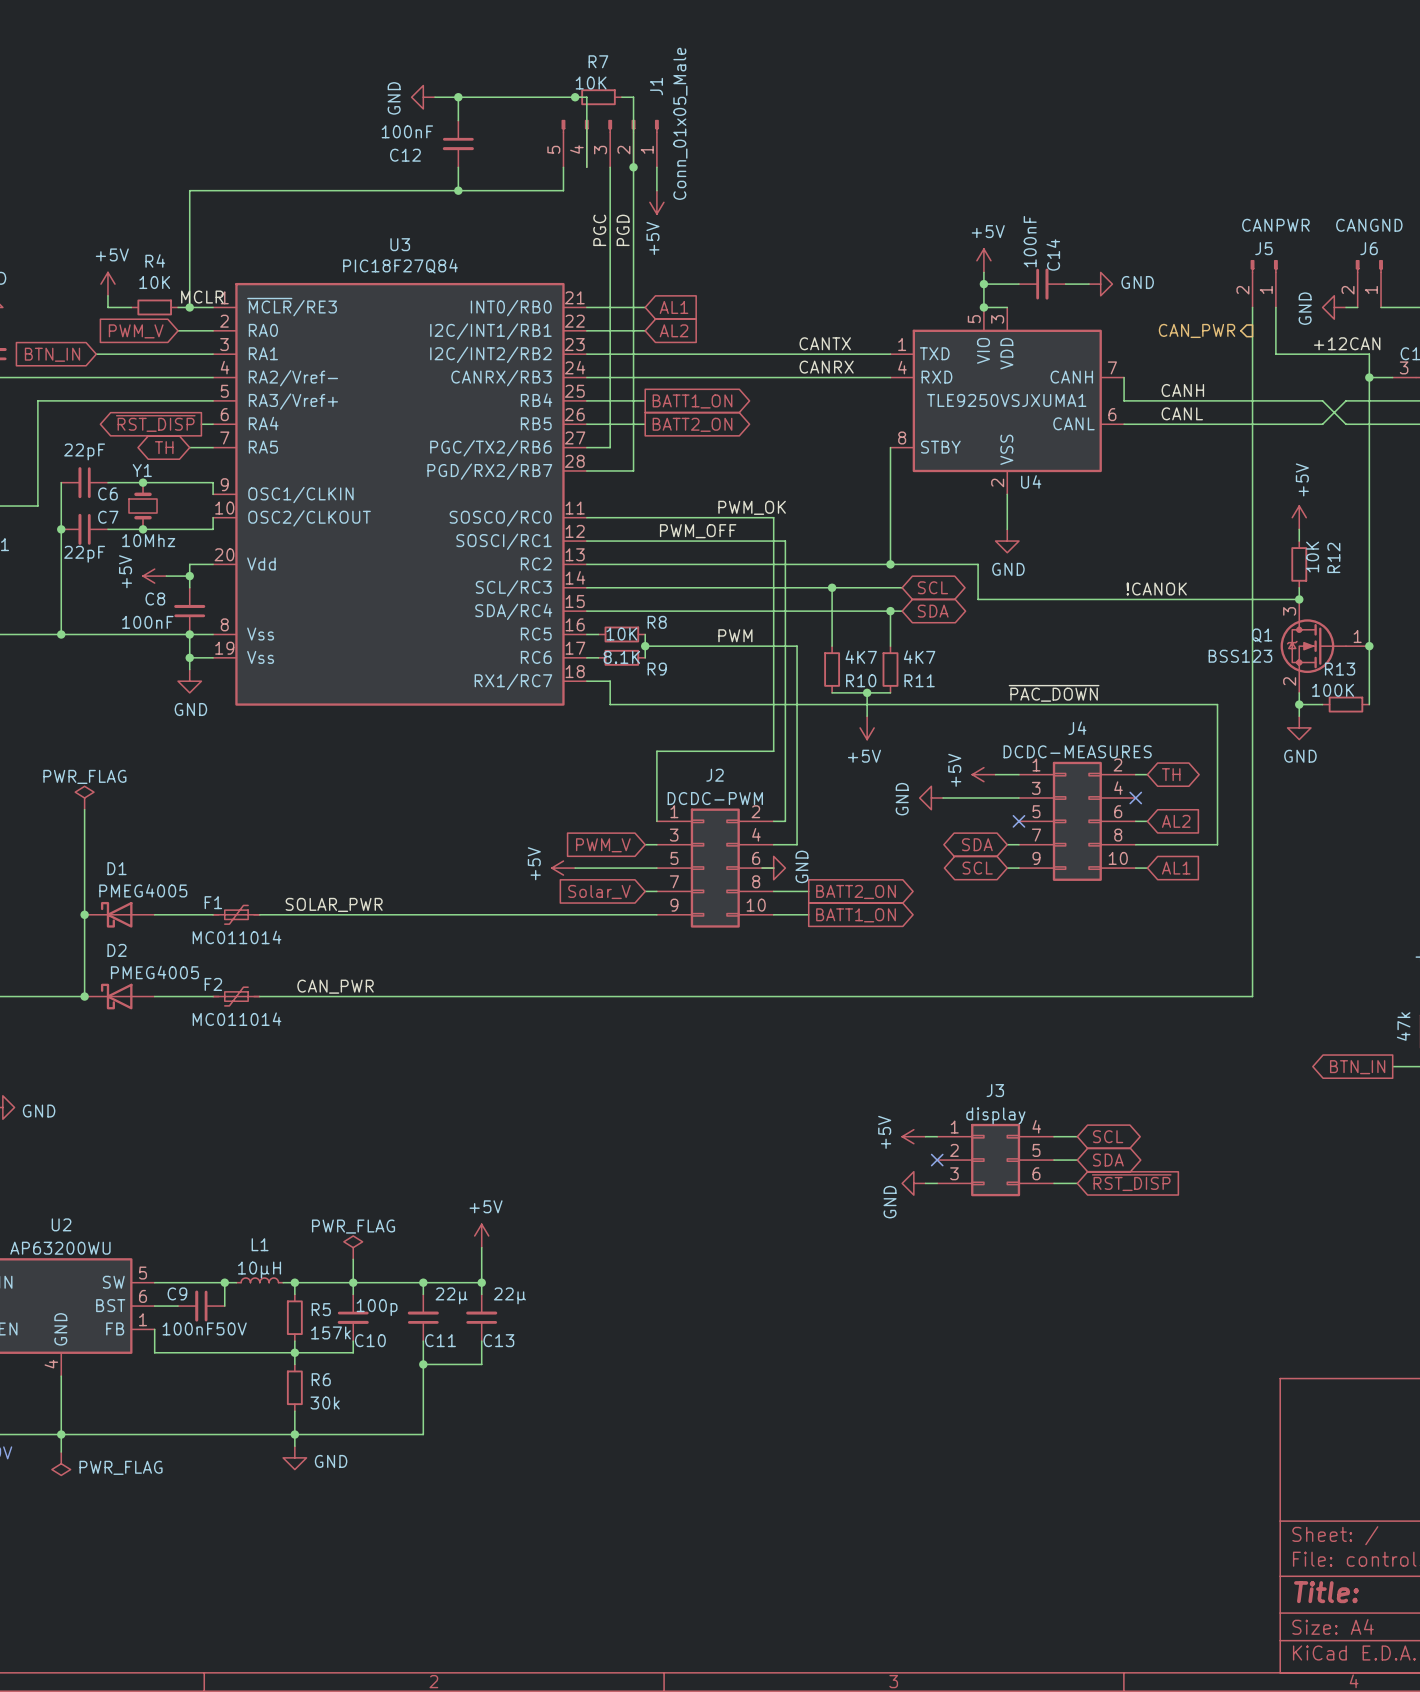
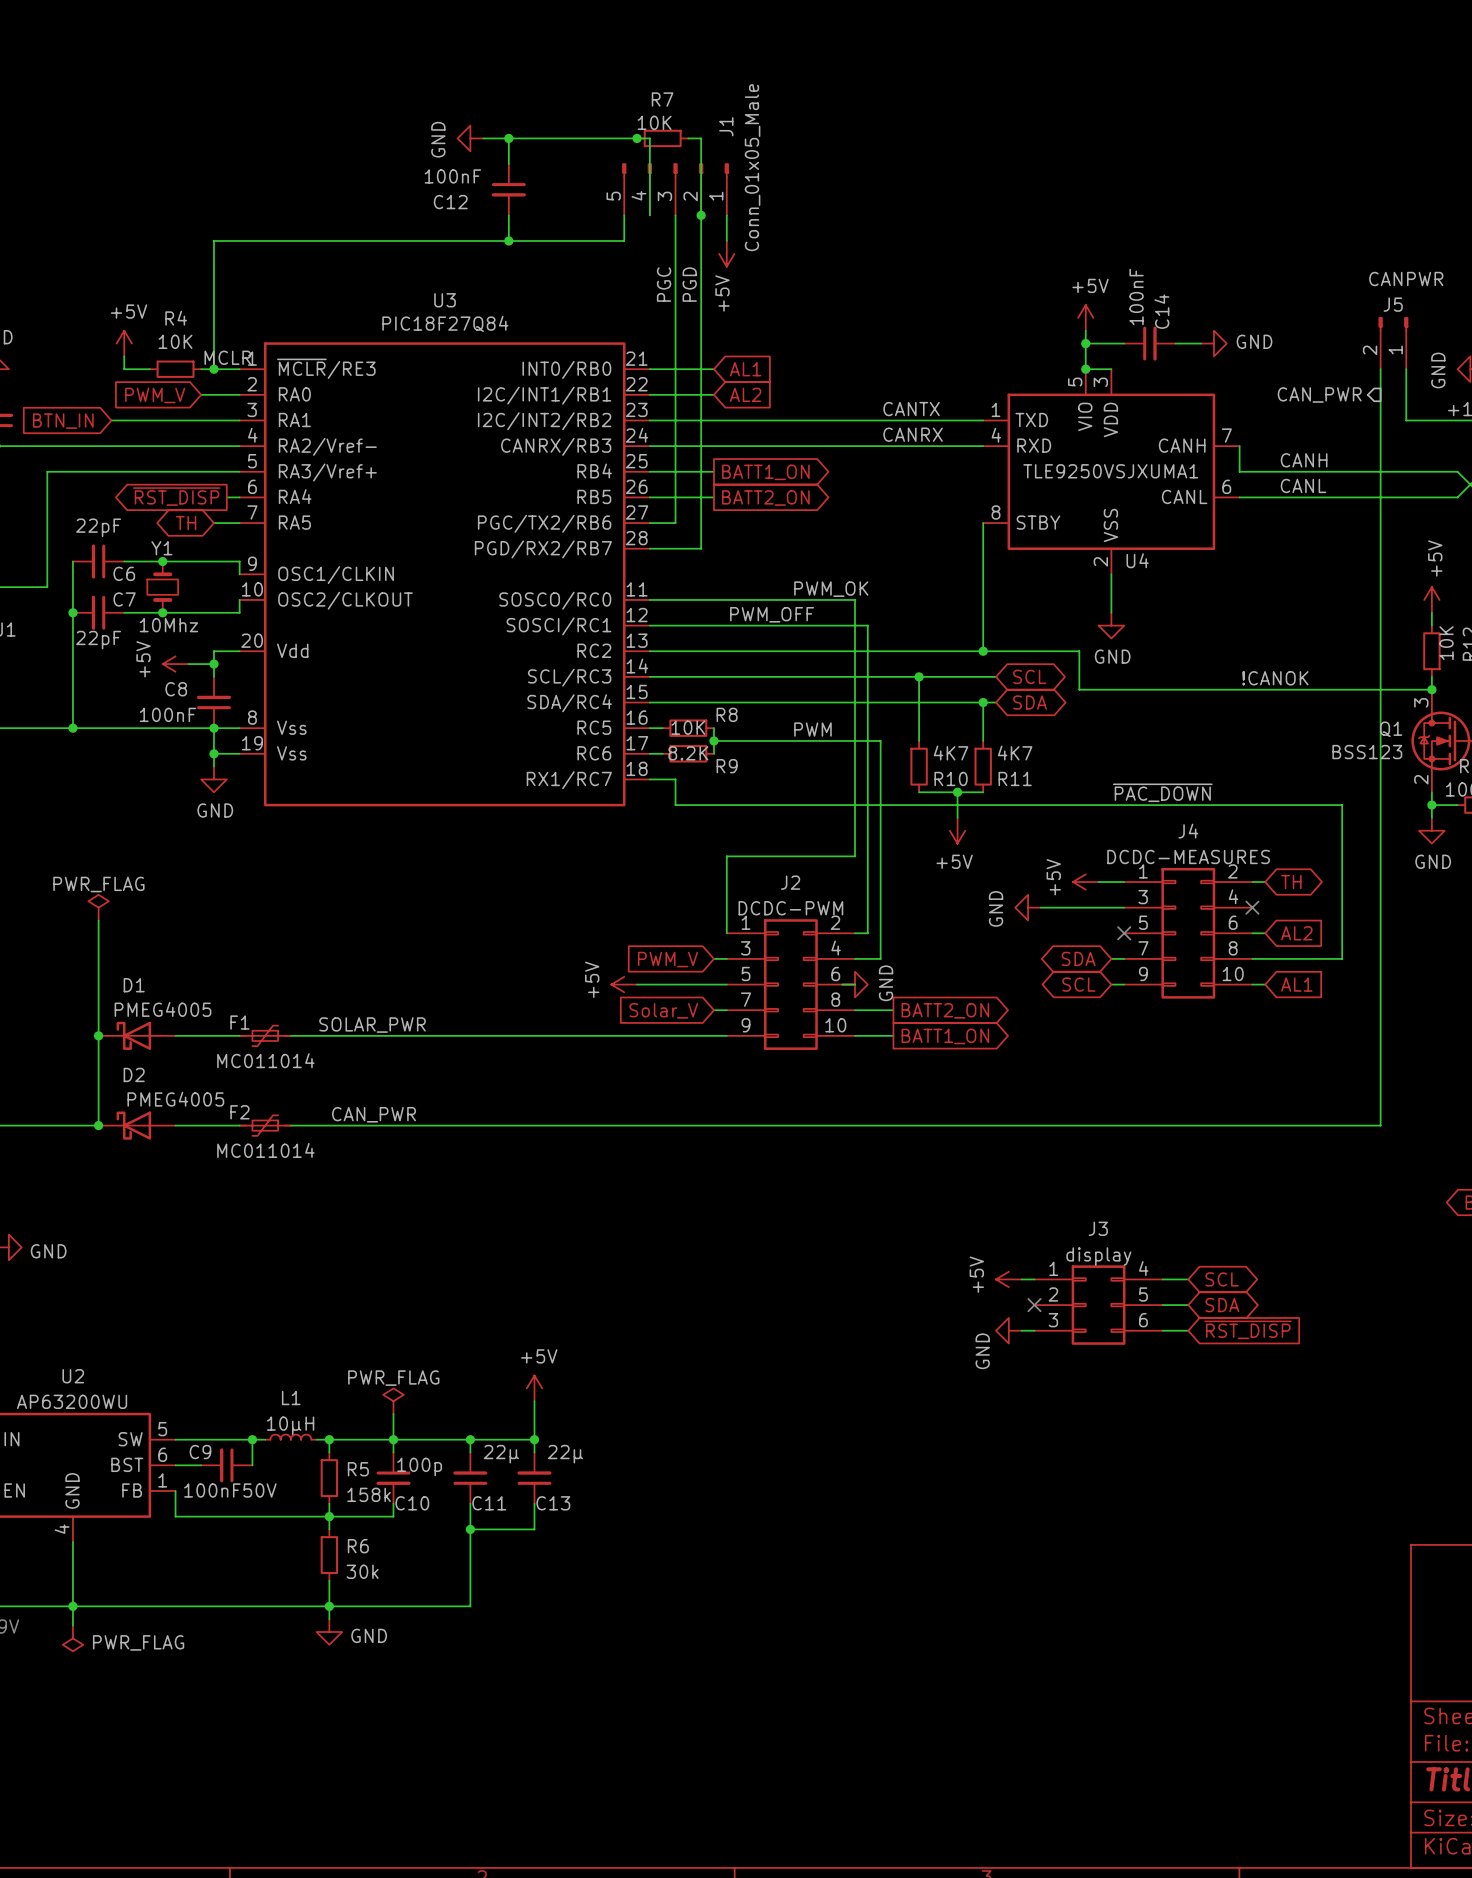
R9 value: 8.1K (621, 657) -> 8.2K (688, 753)
R5 value: 157k (330, 1332) -> 158k (369, 1494)

